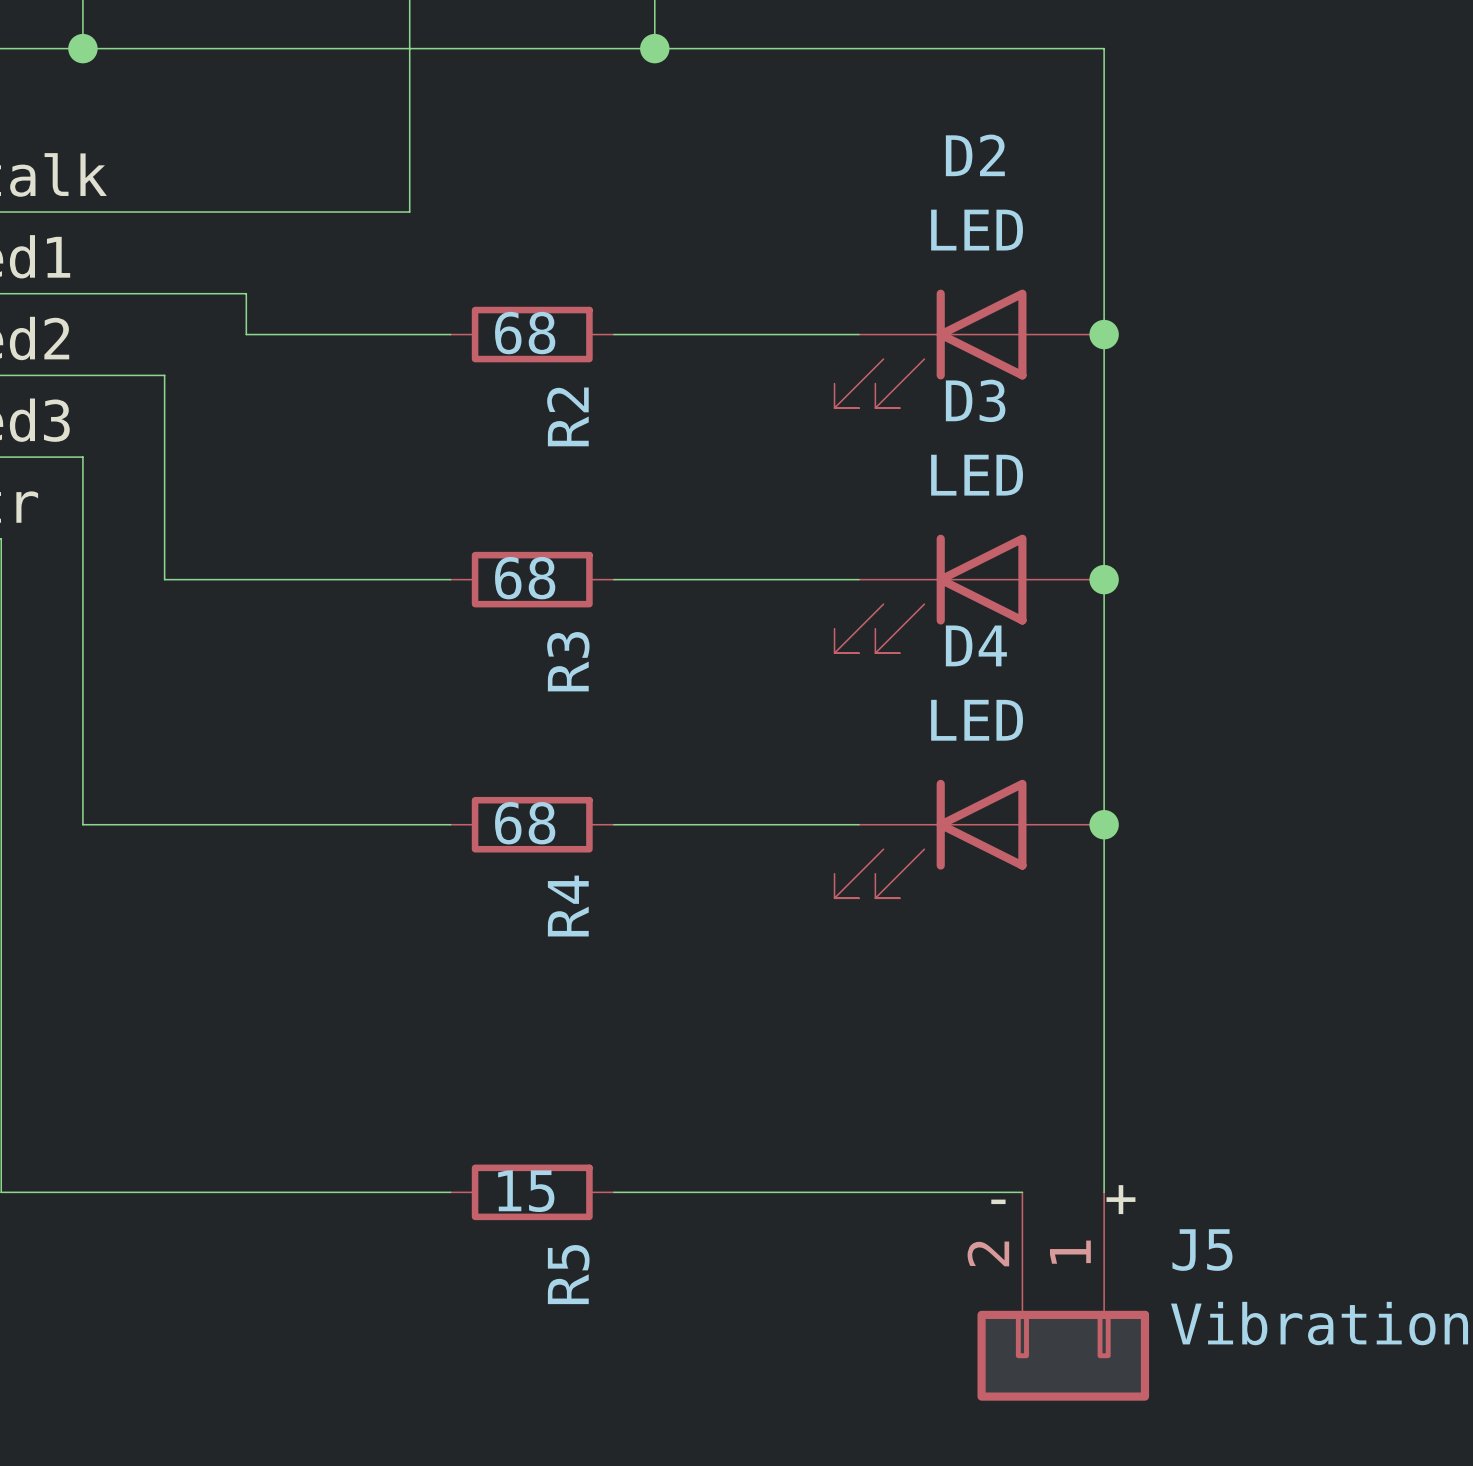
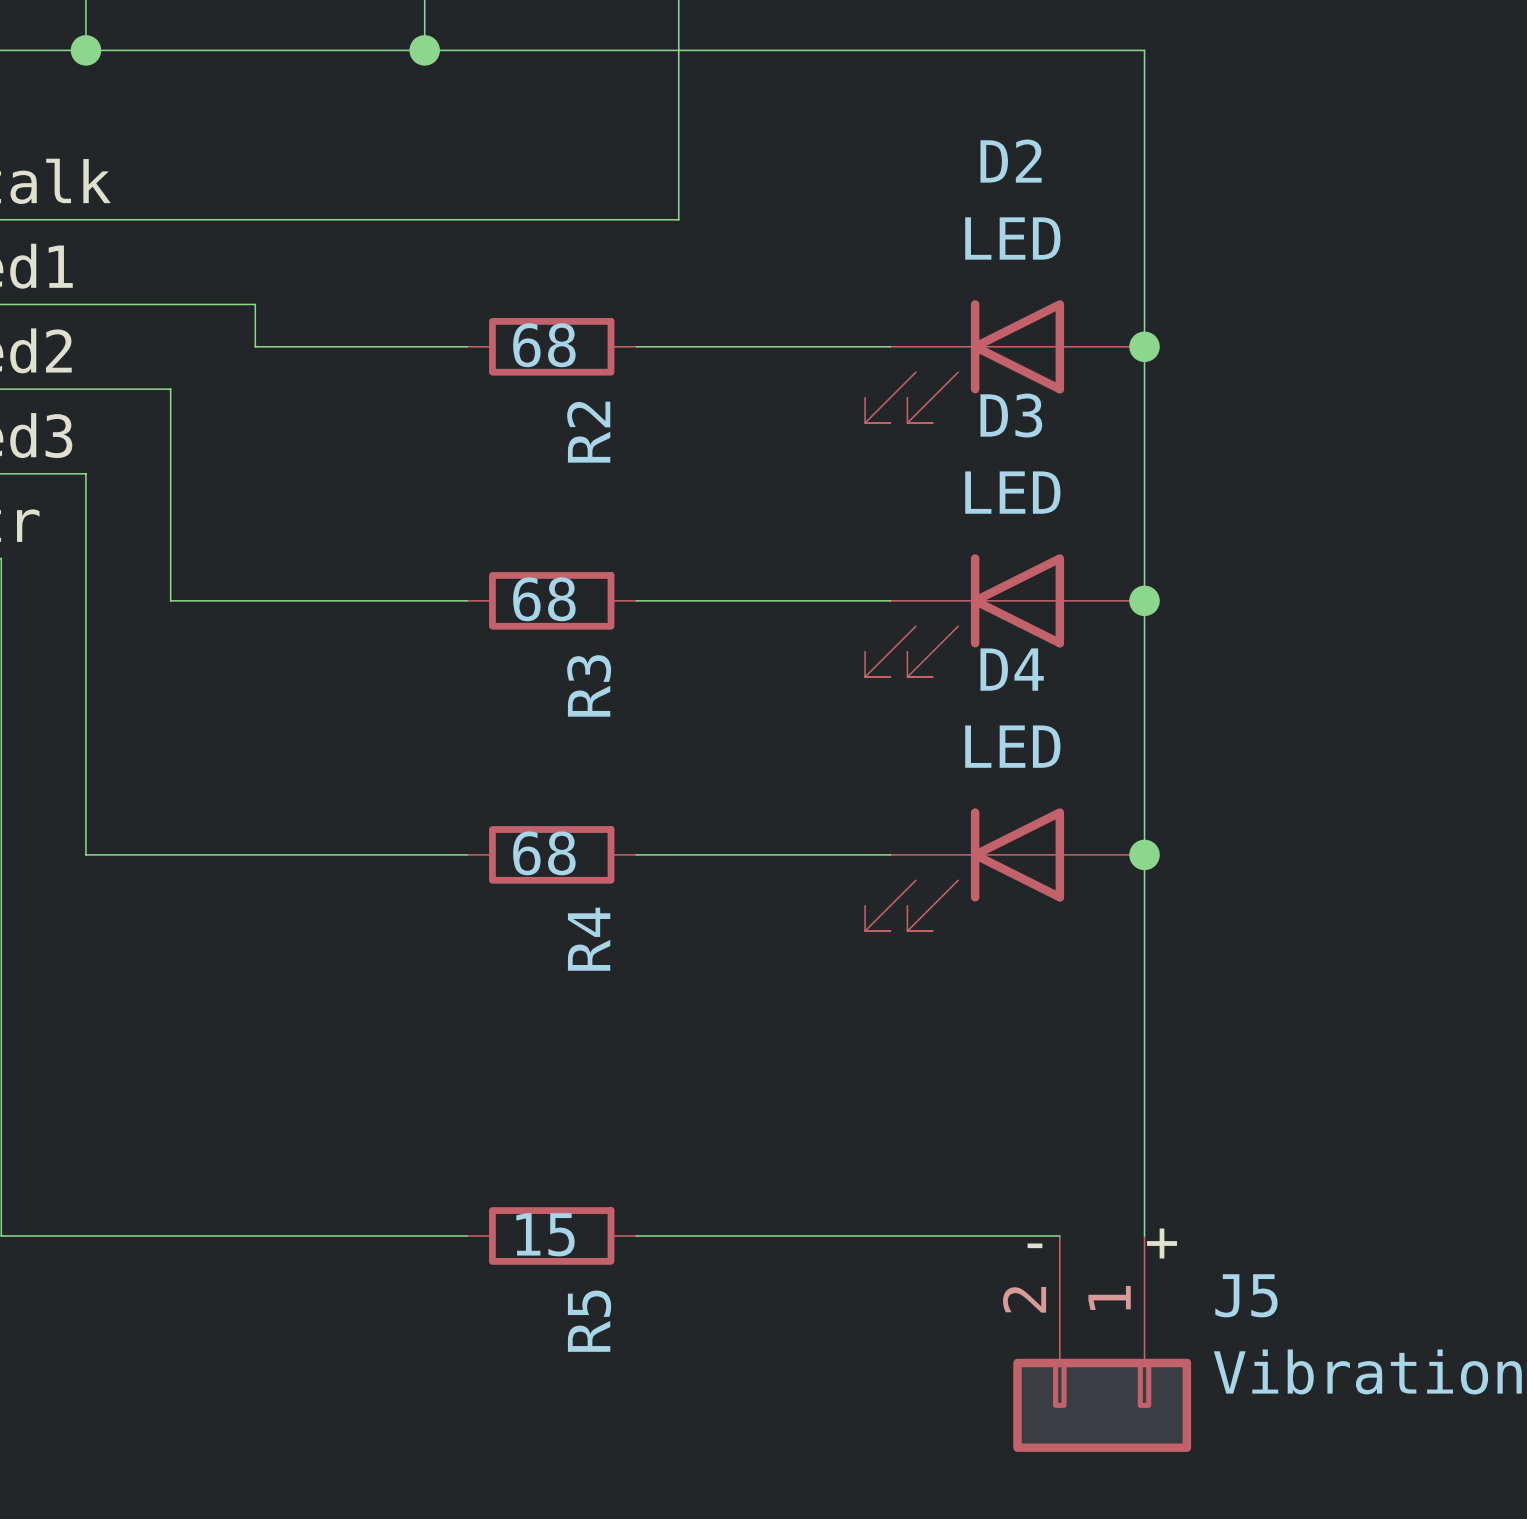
wire: (409, 48) (409, 212) -> (678, 50) (678, 219) (424, 219)
junction: none -> (424, 50)
junction: (654, 48) -> none

